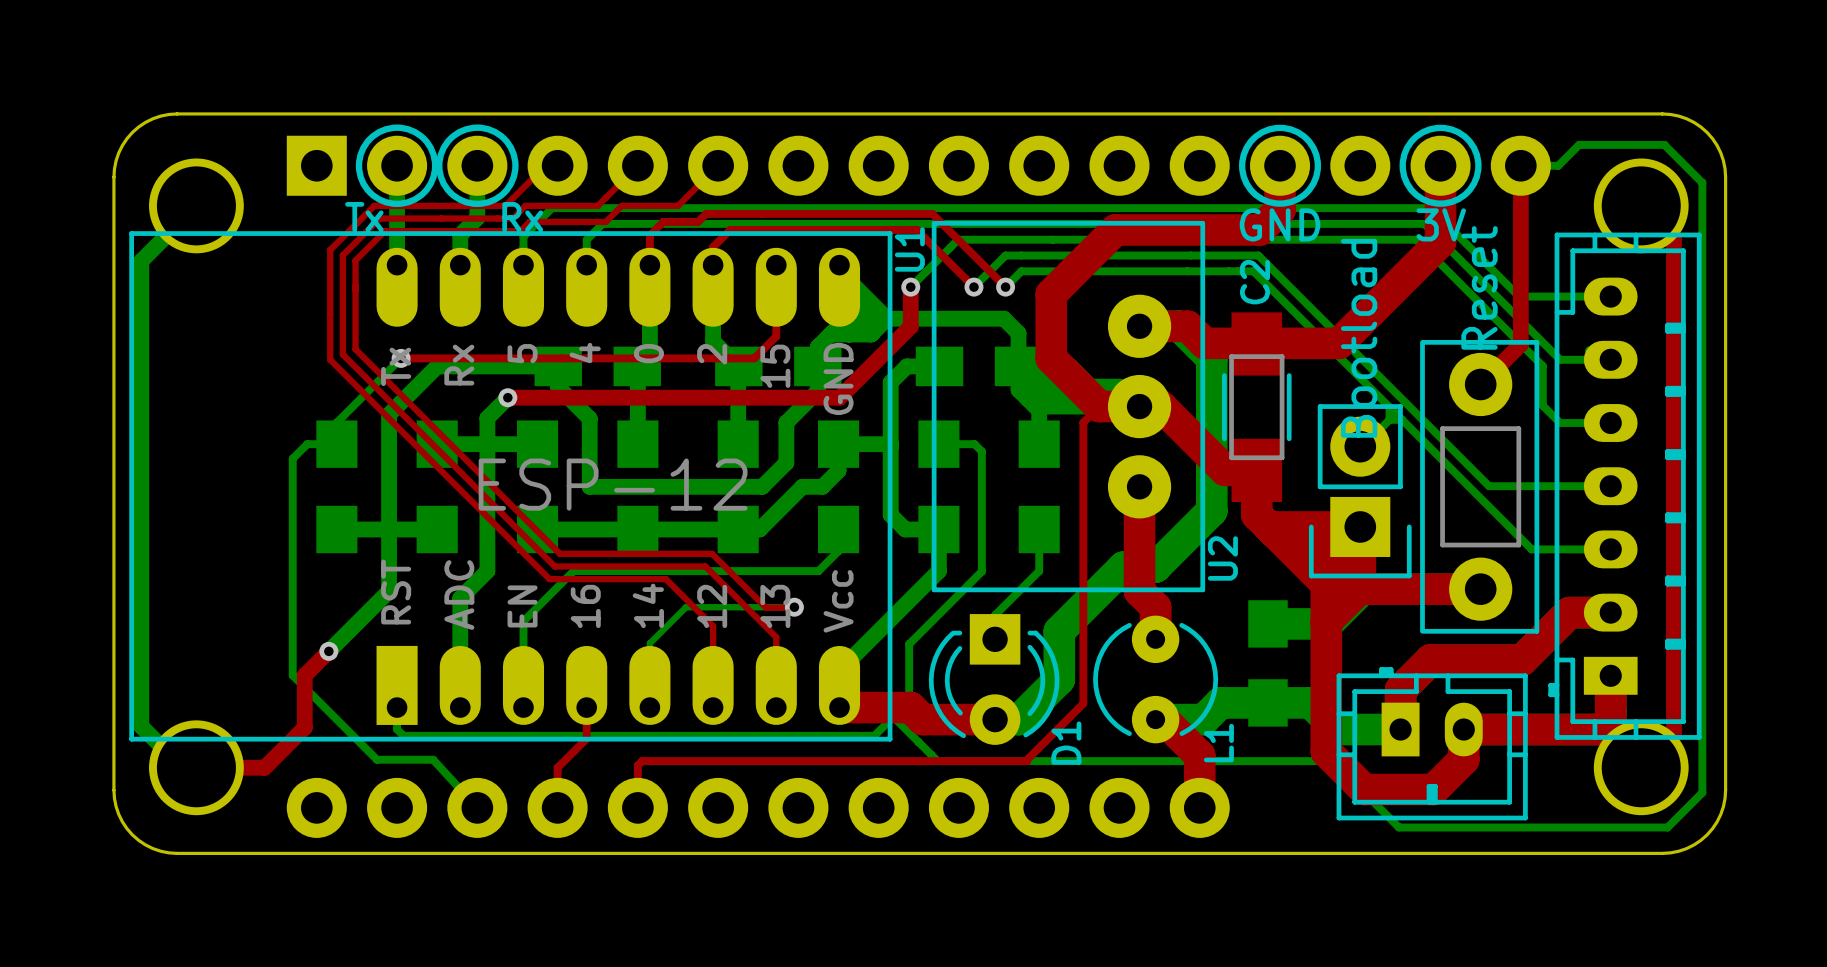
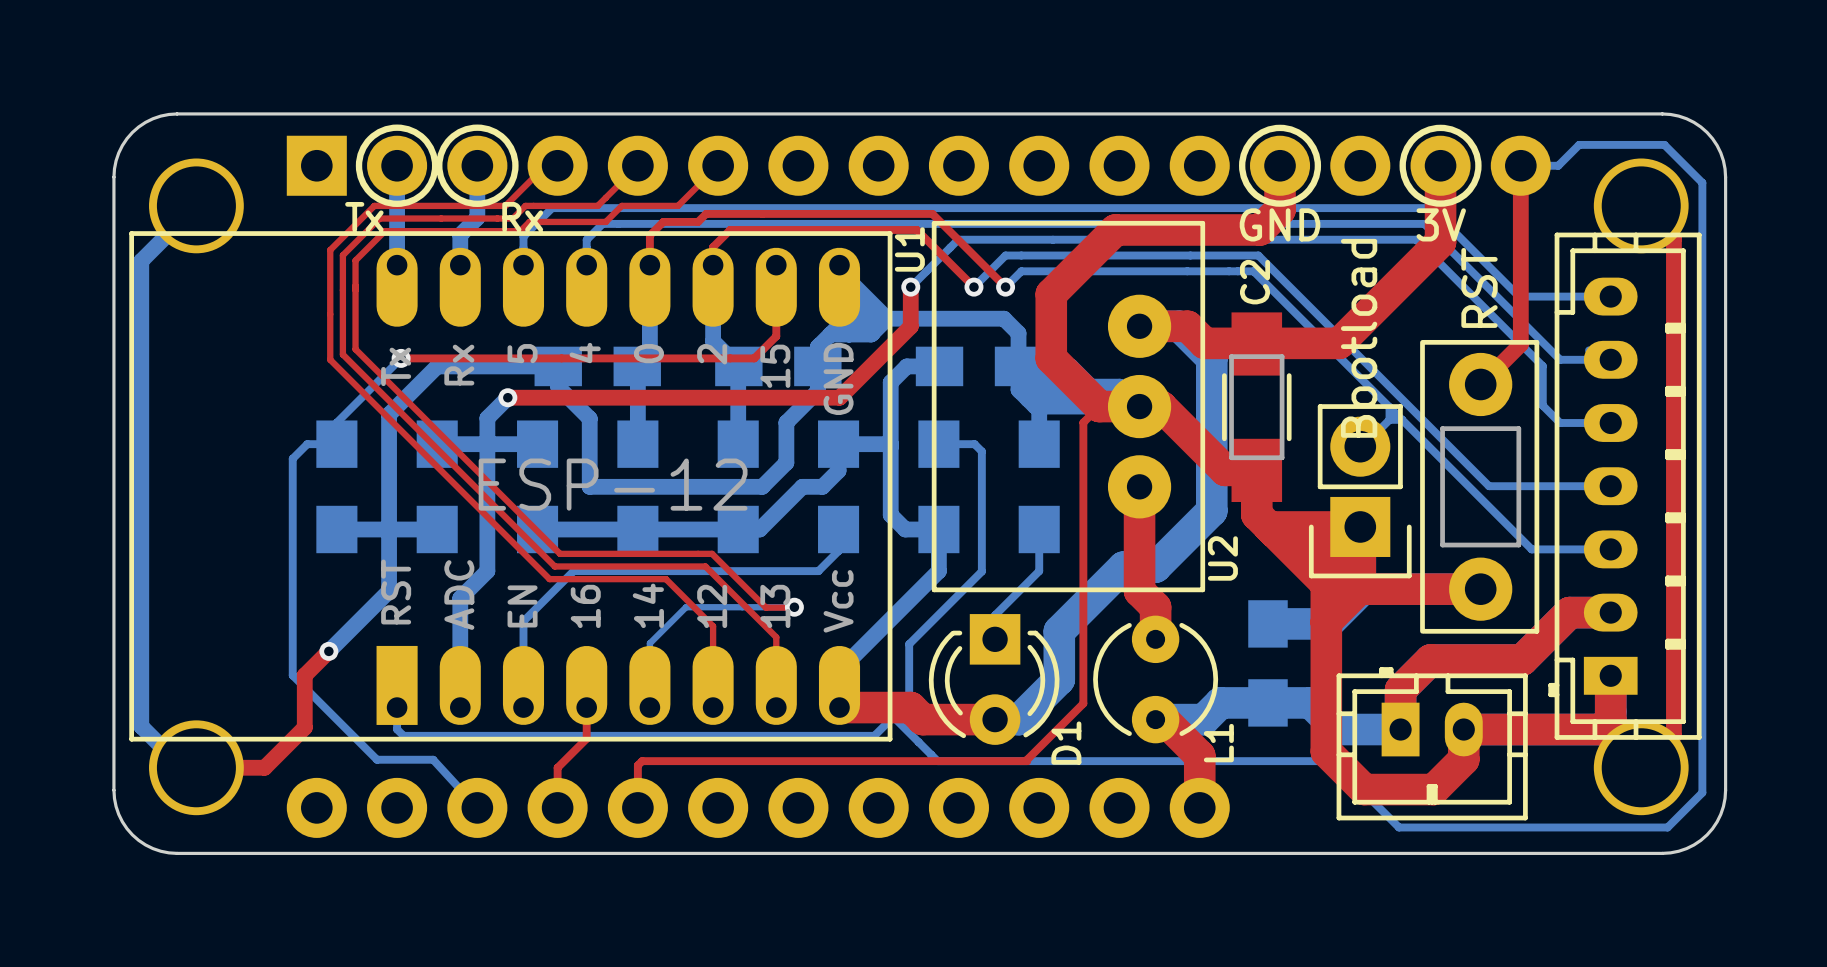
part value: Reset (1479, 287) -> RST (1479, 287)

